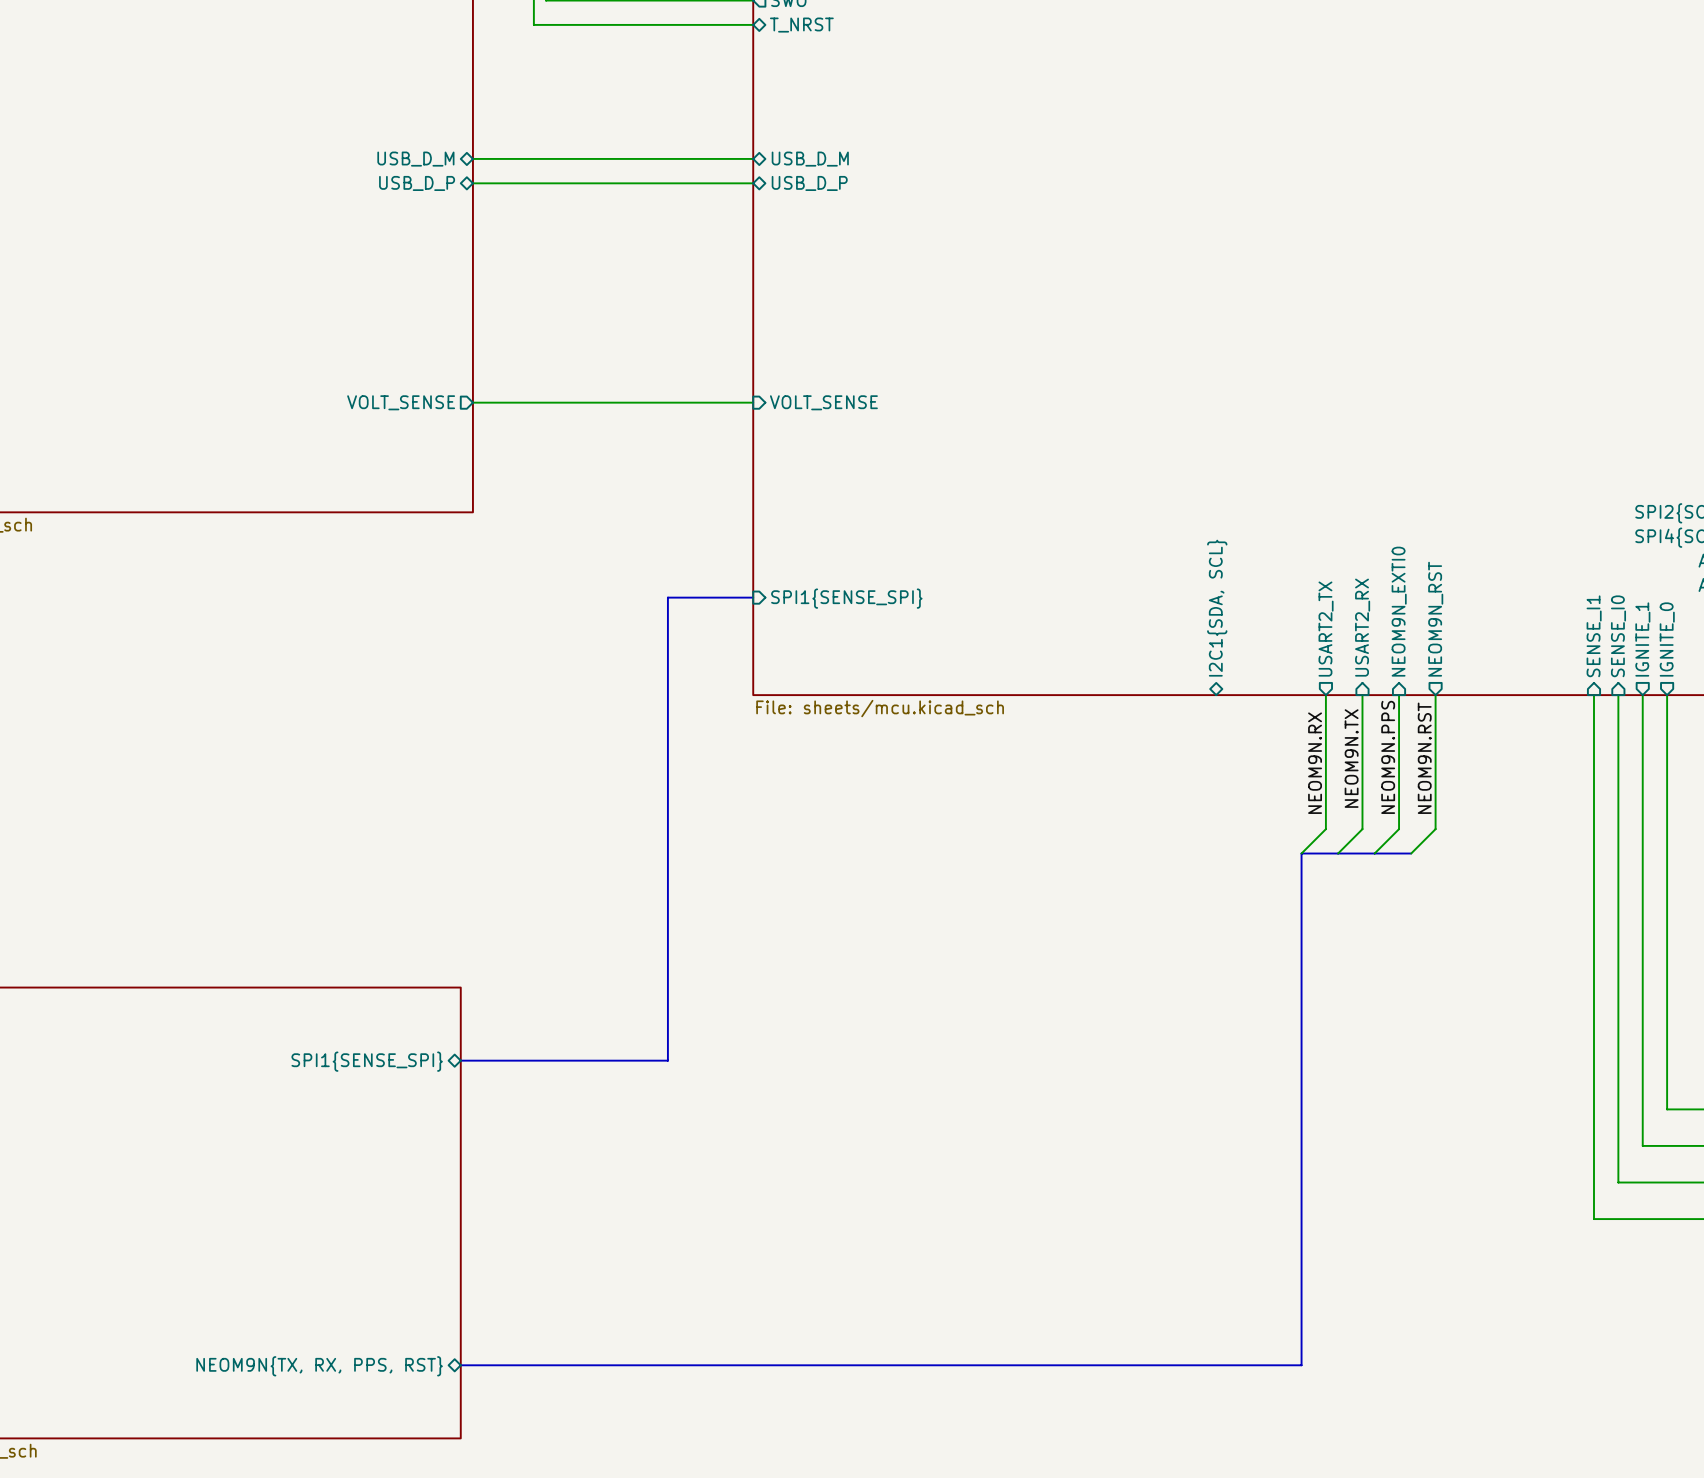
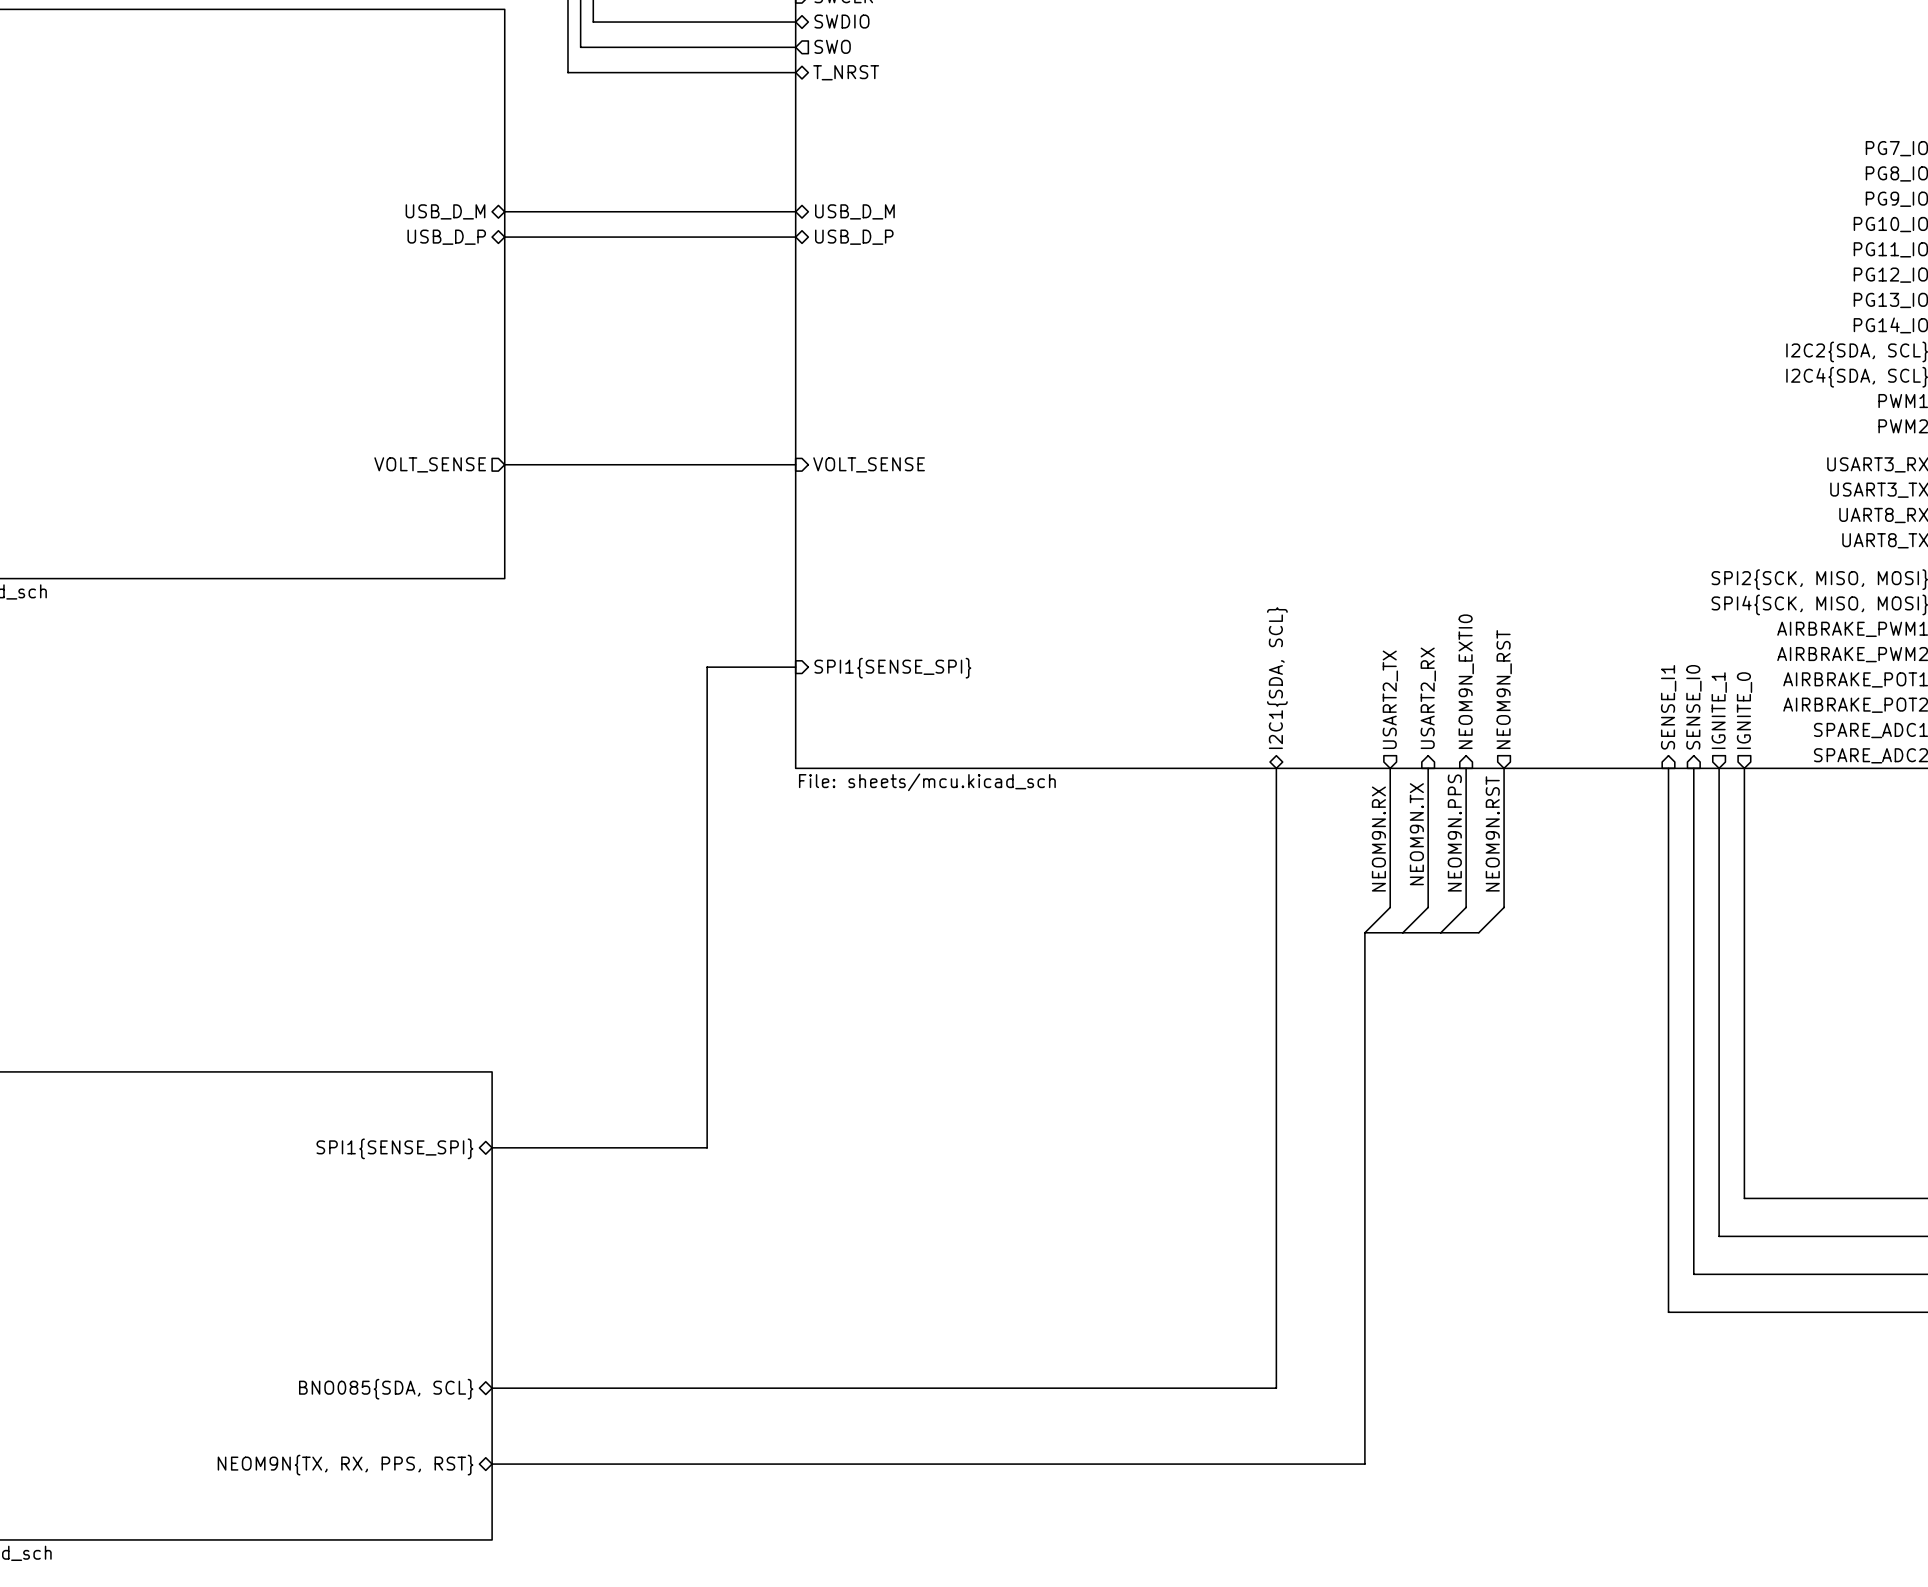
bus: none -> (1276, 768) (1276, 1388) (492, 1388)
sheet pin: none -> BNO085{SDA, SCL} (386, 1389)

